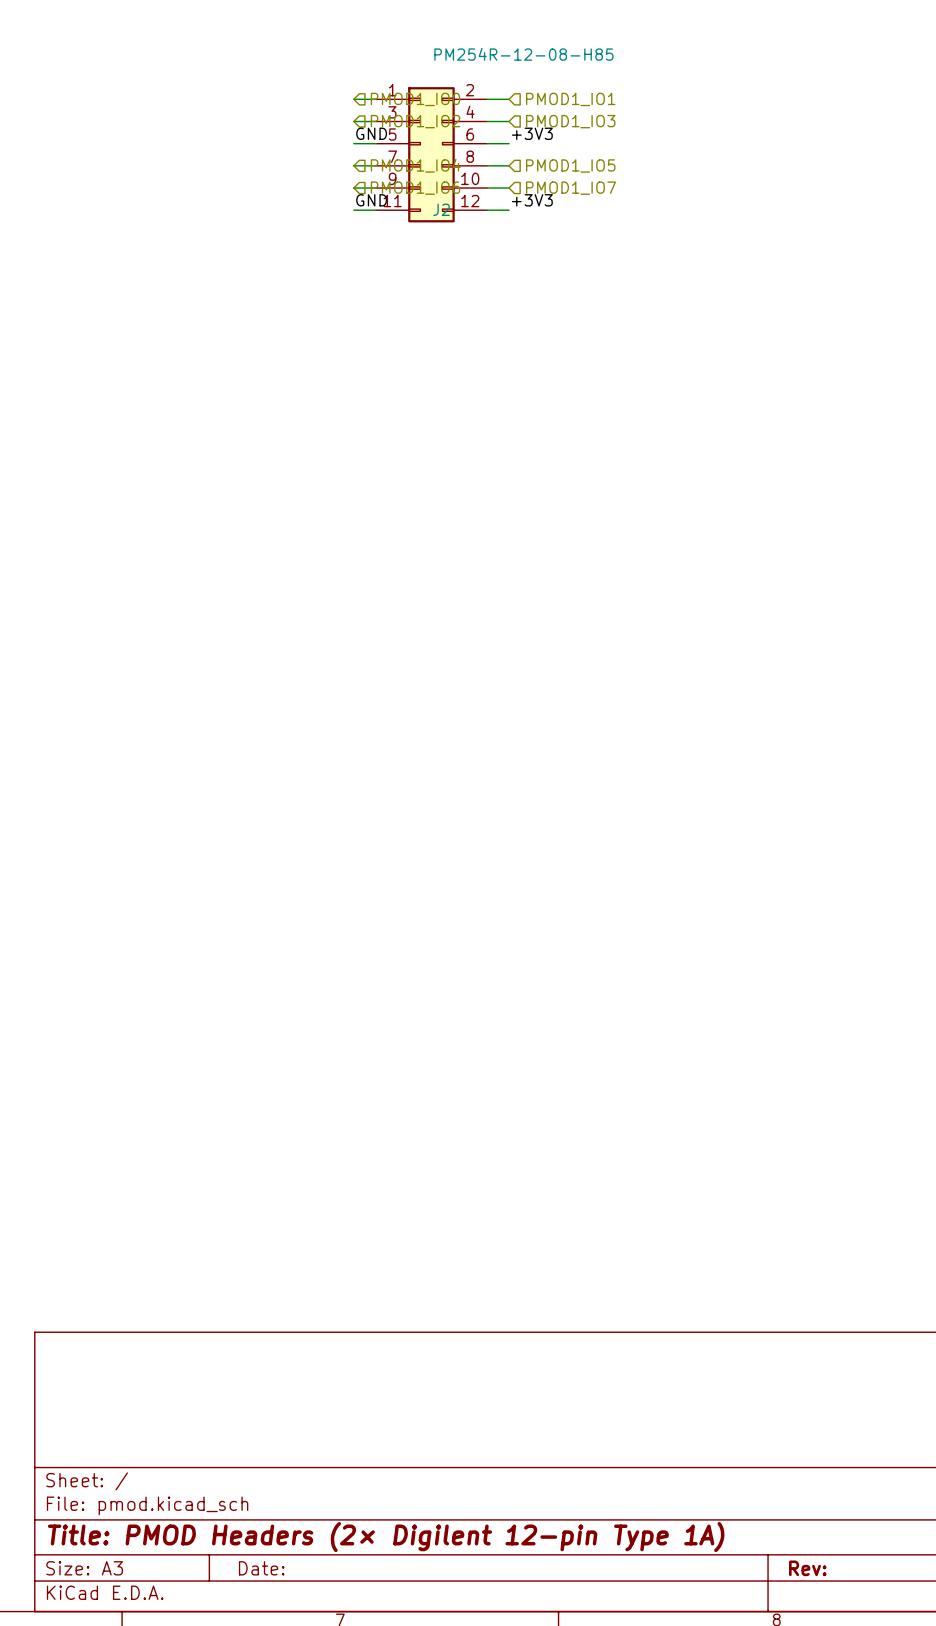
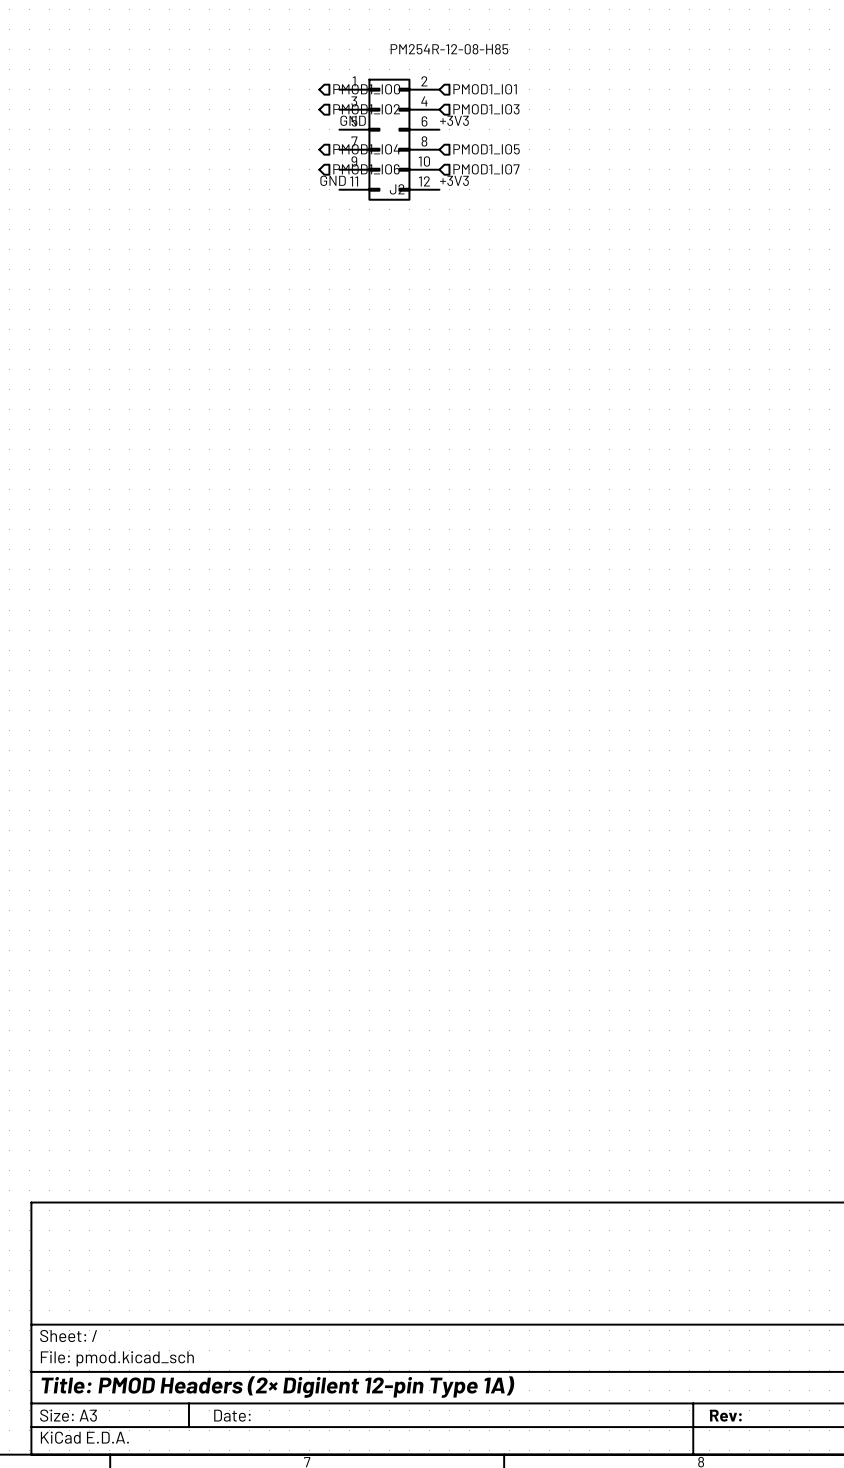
wire: (353, 99) (376, 99) -> none
wire: (486, 99) (509, 99) -> none
hierarchical label position: PMOD1_IO1 (570, 99) -> PMOD1_IO1 (485, 89)
wire: (353, 121) (376, 121) -> none
wire: (486, 121) (509, 121) -> none
hierarchical label position: PMOD1_IO3 (570, 121) -> PMOD1_IO3 (486, 109)
label position: GND (371, 133) -> GND (353, 120)
label position: +3V3 (532, 133) -> +3V3 (454, 120)
wire: (353, 143) (376, 143) -> none
wire: (486, 143) (509, 143) -> none
wire: (353, 165) (376, 165) -> none
wire: (486, 165) (509, 165) -> none
hierarchical label position: PMOD1_IO5 (570, 165) -> PMOD1_IO5 (486, 149)
wire: (353, 188) (376, 188) -> none
wire: (486, 188) (509, 188) -> none
hierarchical label position: PMOD1_IO7 (570, 188) -> PMOD1_IO7 (486, 169)
label position: +3V3 (532, 200) -> +3V3 (454, 180)
wire: (353, 210) (376, 210) -> none
wire: (486, 210) (509, 210) -> none

